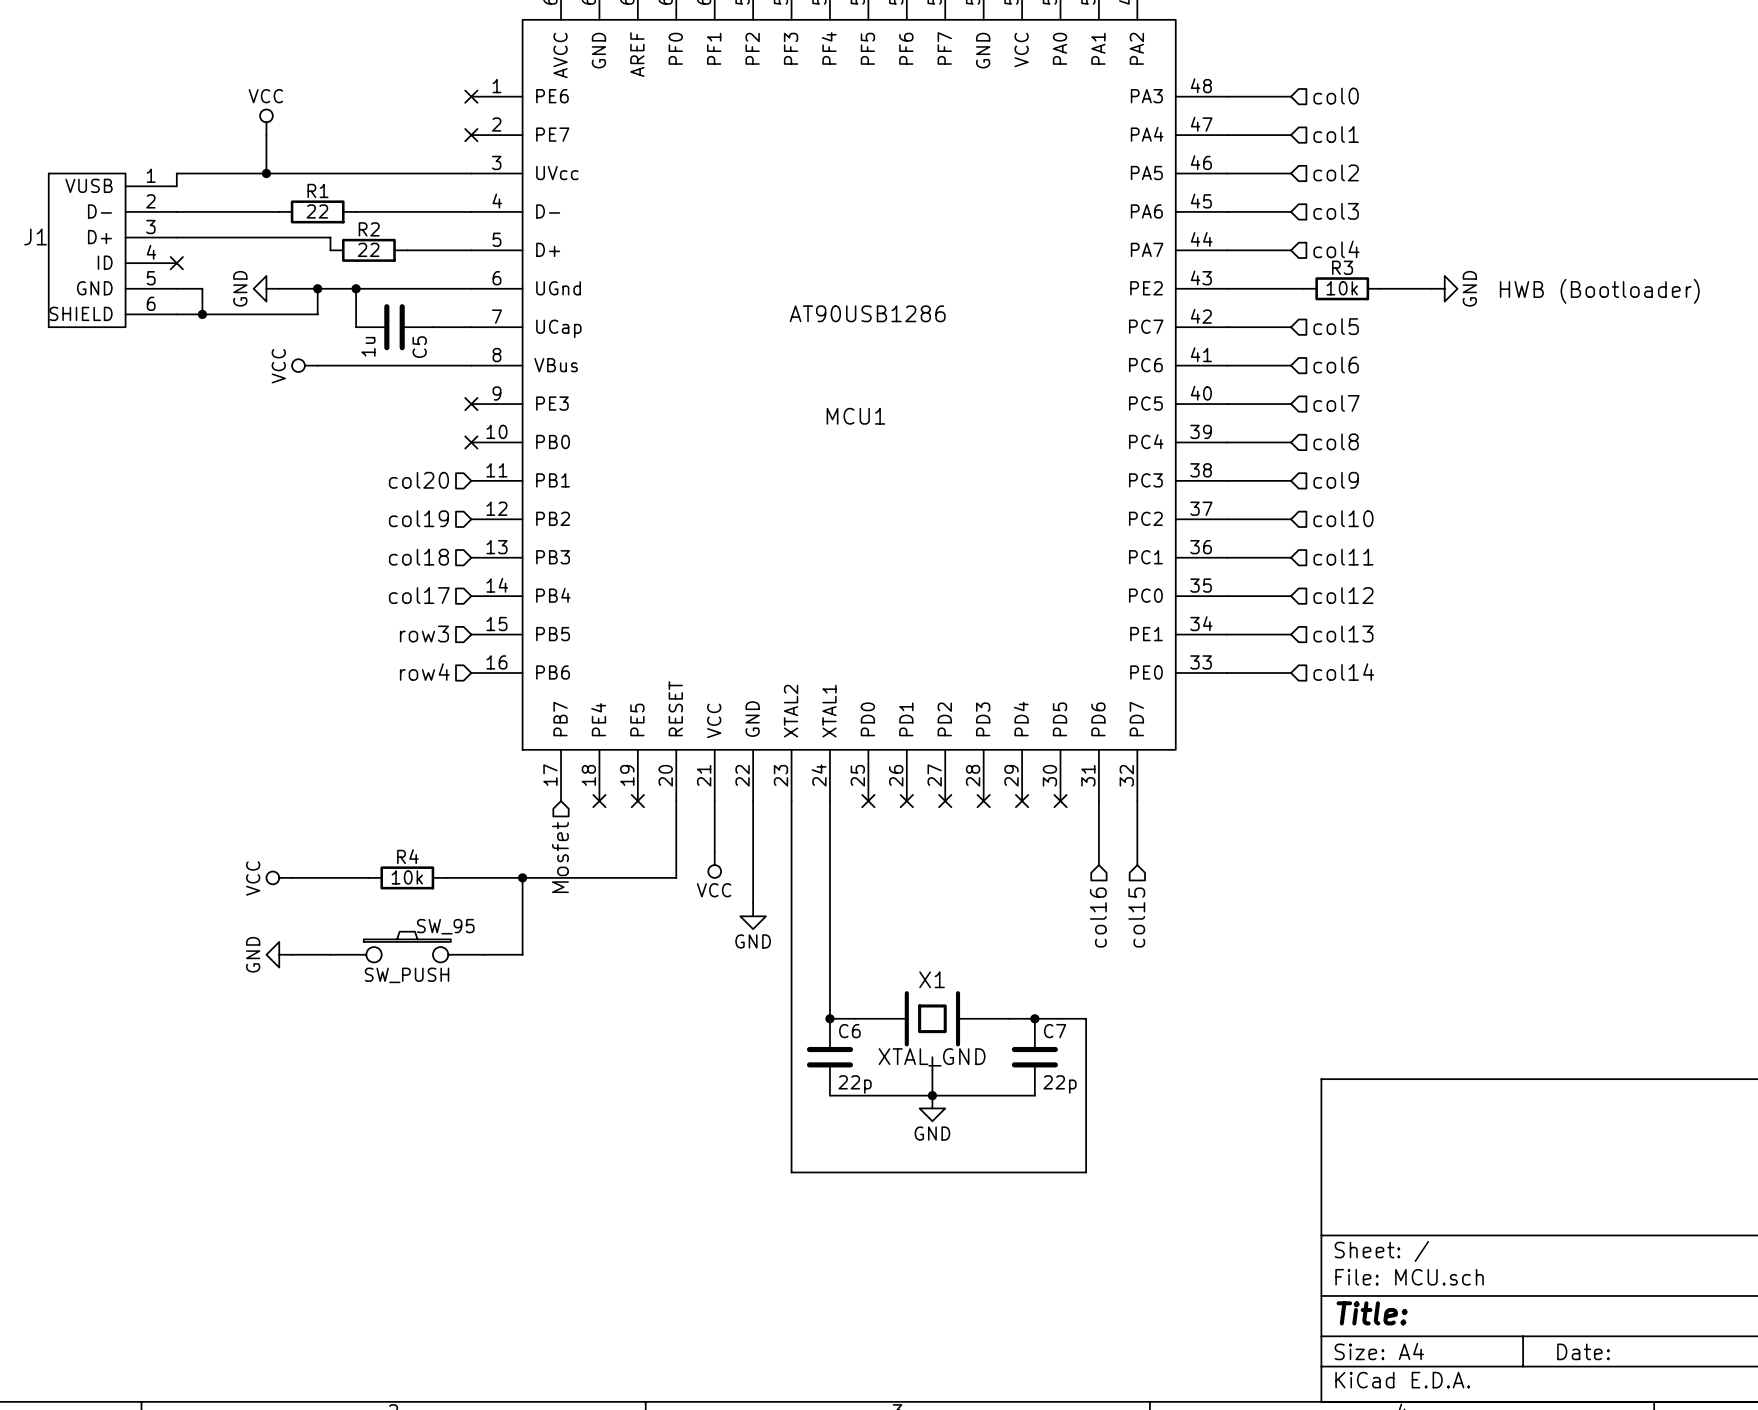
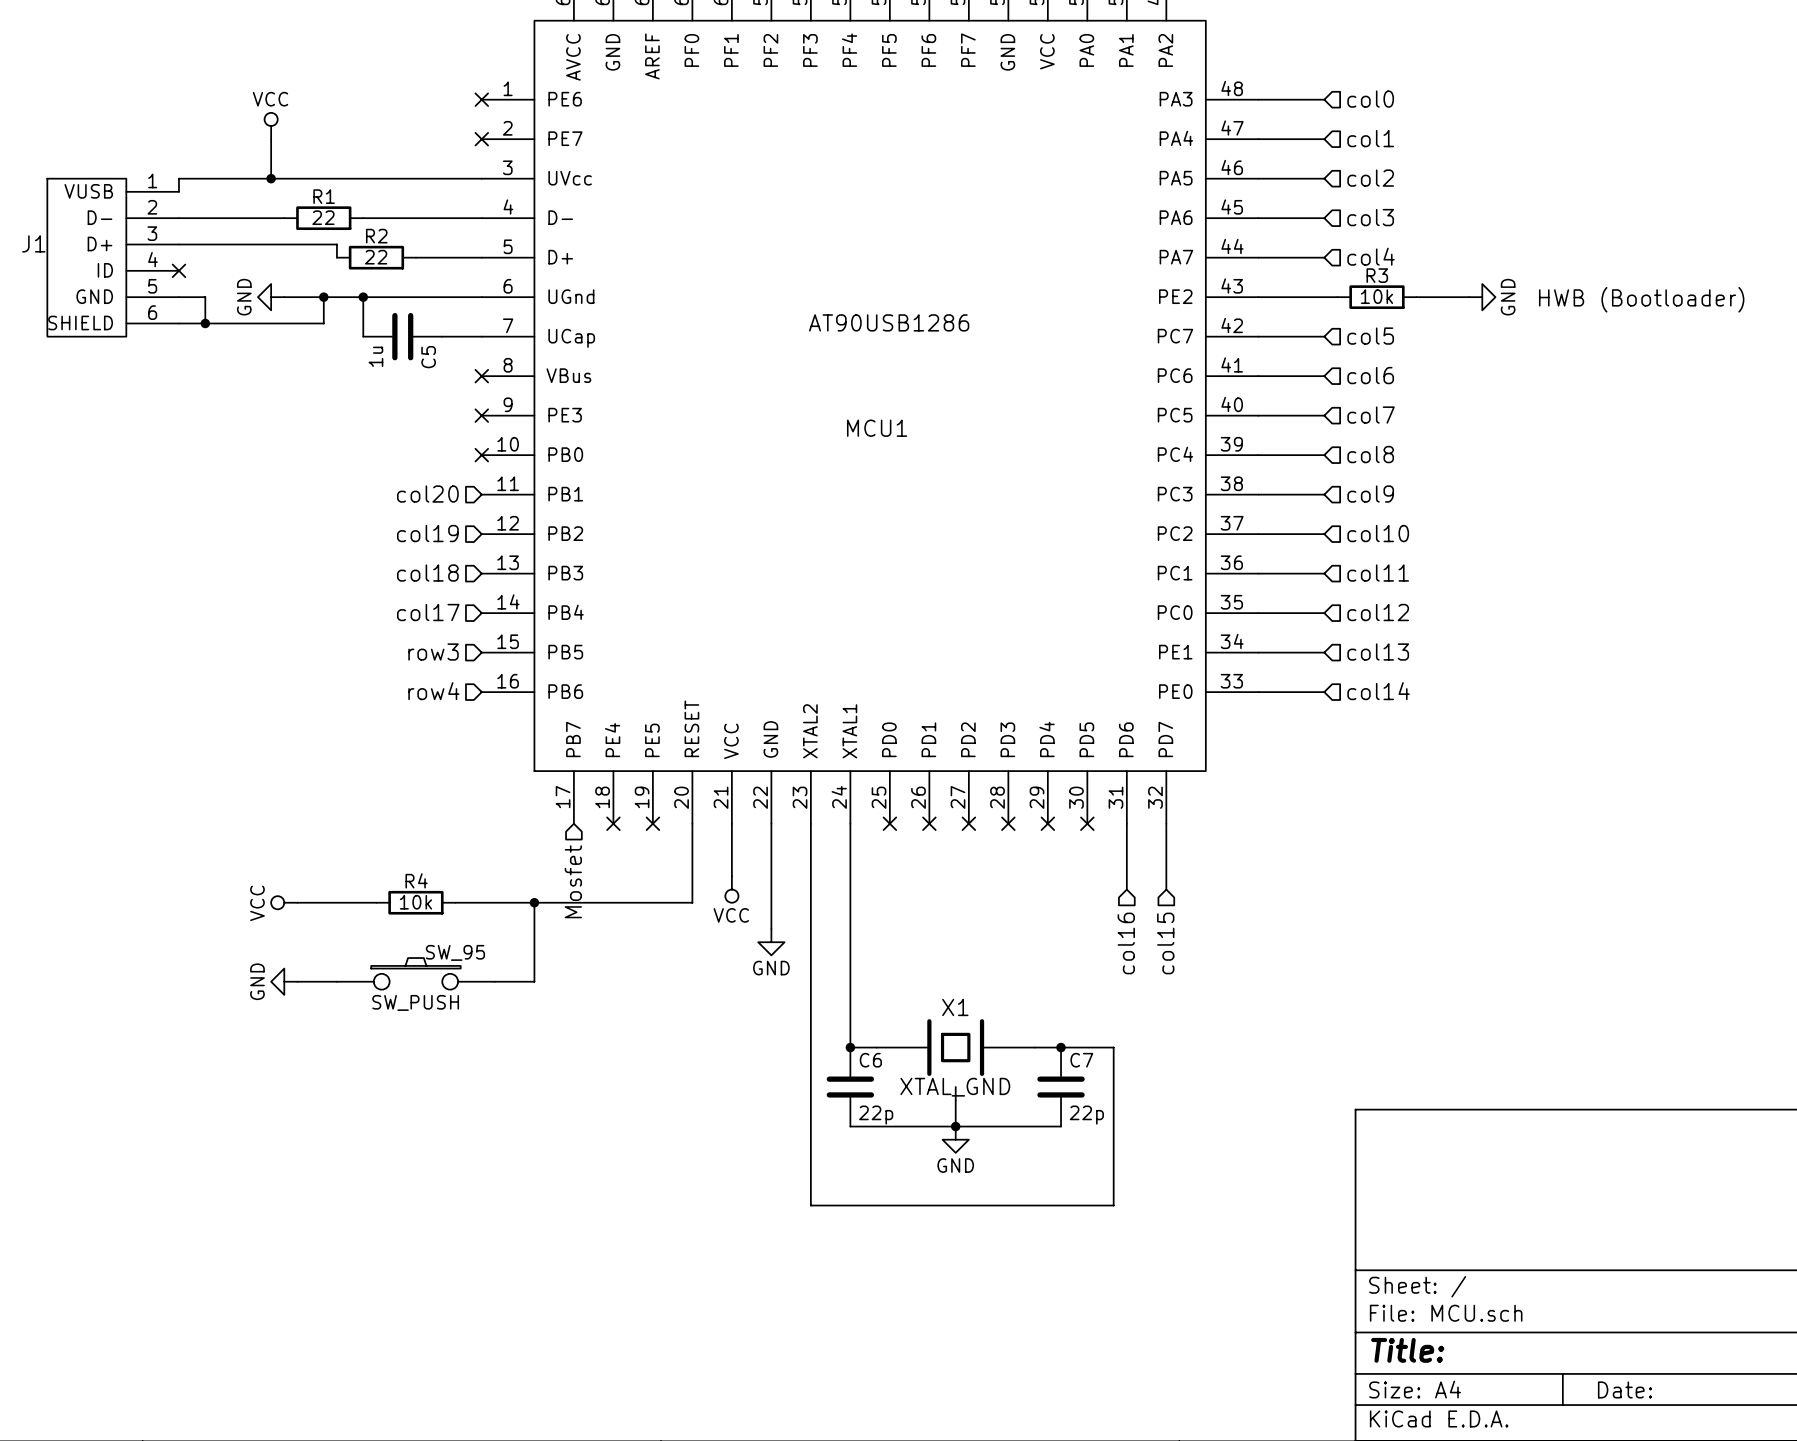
power symbol: VCC (304, 365) -> none
wire: (317, 365) (471, 365) -> none
no-connect mark: none -> (481, 376)

